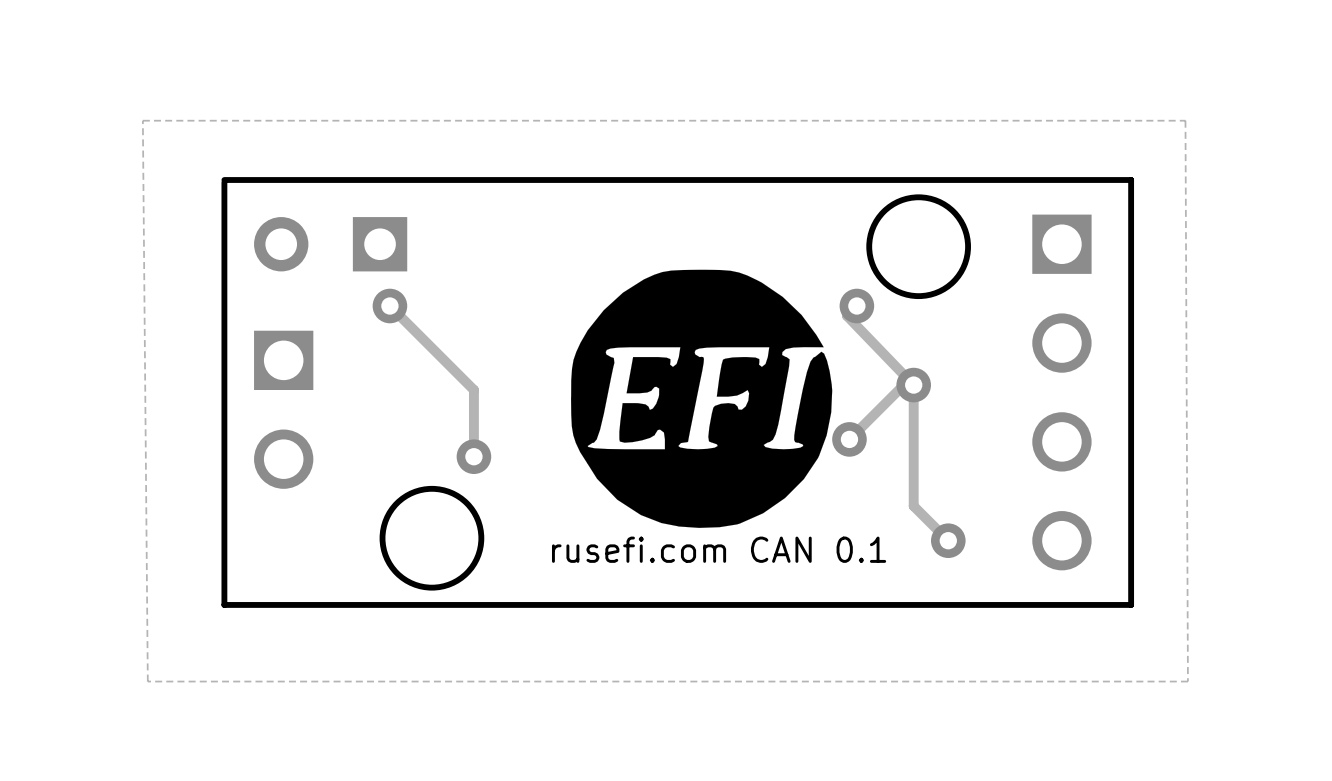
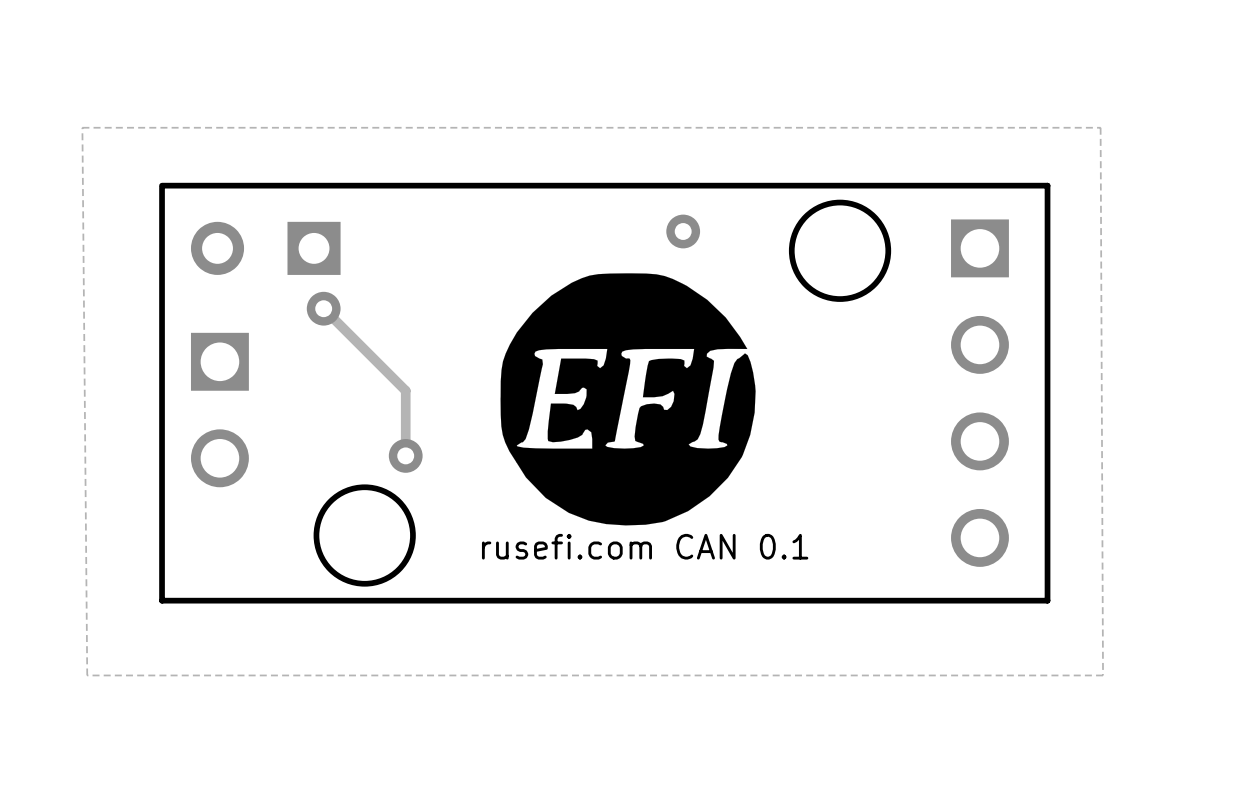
via: none -> (683, 231)
track: (856, 306) (847, 315) (913, 385) -> none
via: (856, 306) -> none
track: (913, 385) (913, 506) (948, 540) -> none
track: (913, 385) (903, 385) (849, 439) -> none
via: (913, 385) -> none
via: (849, 439) -> none
via: (948, 540) -> none

